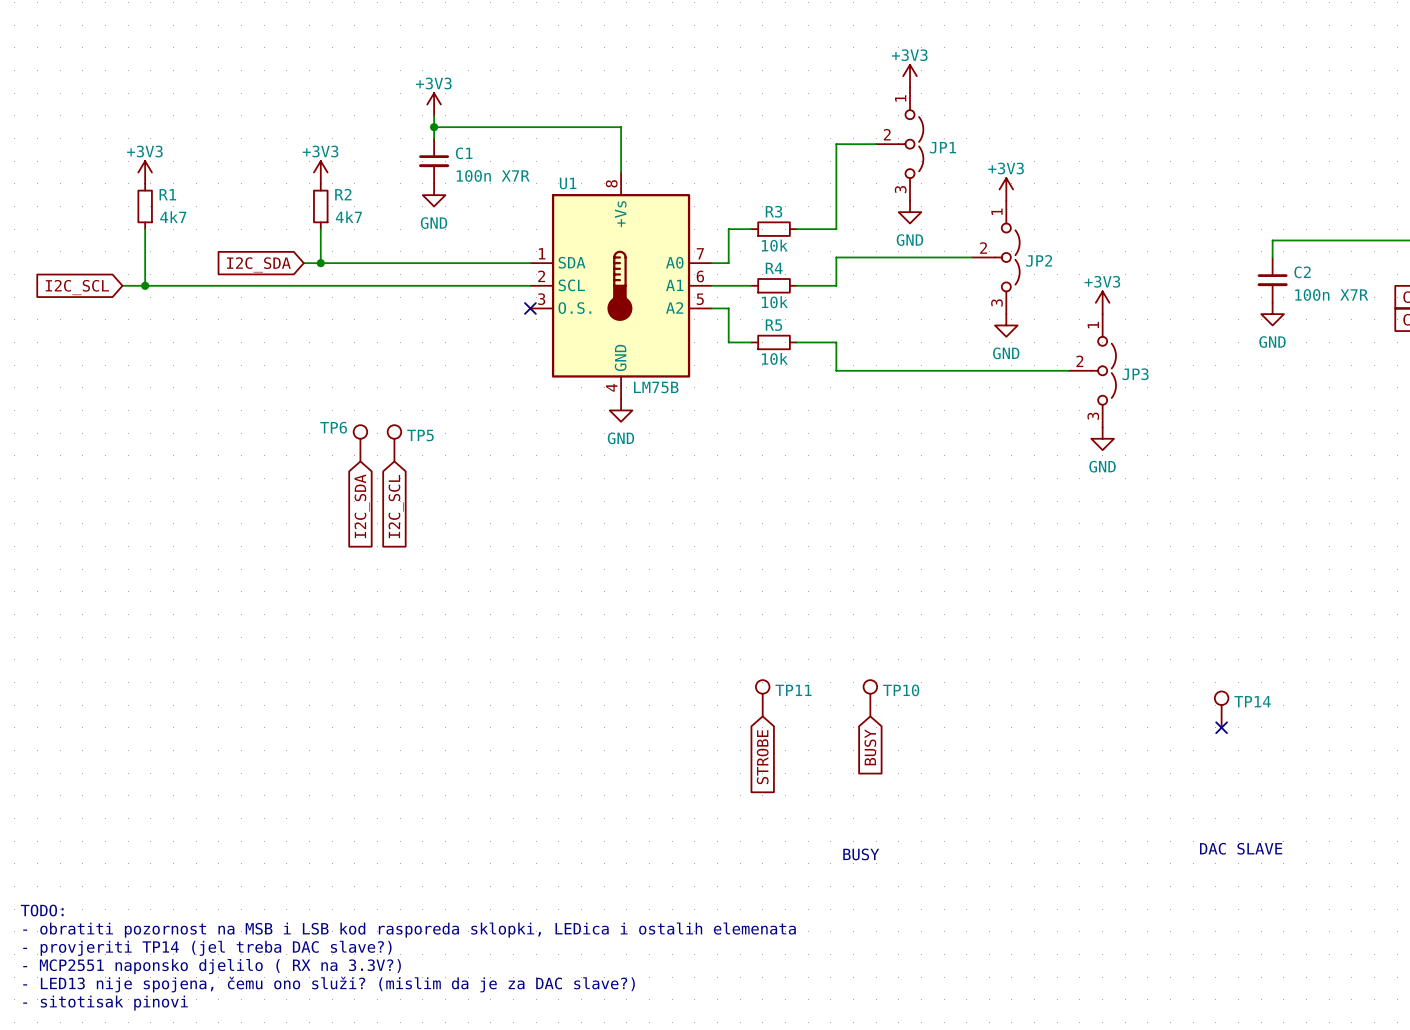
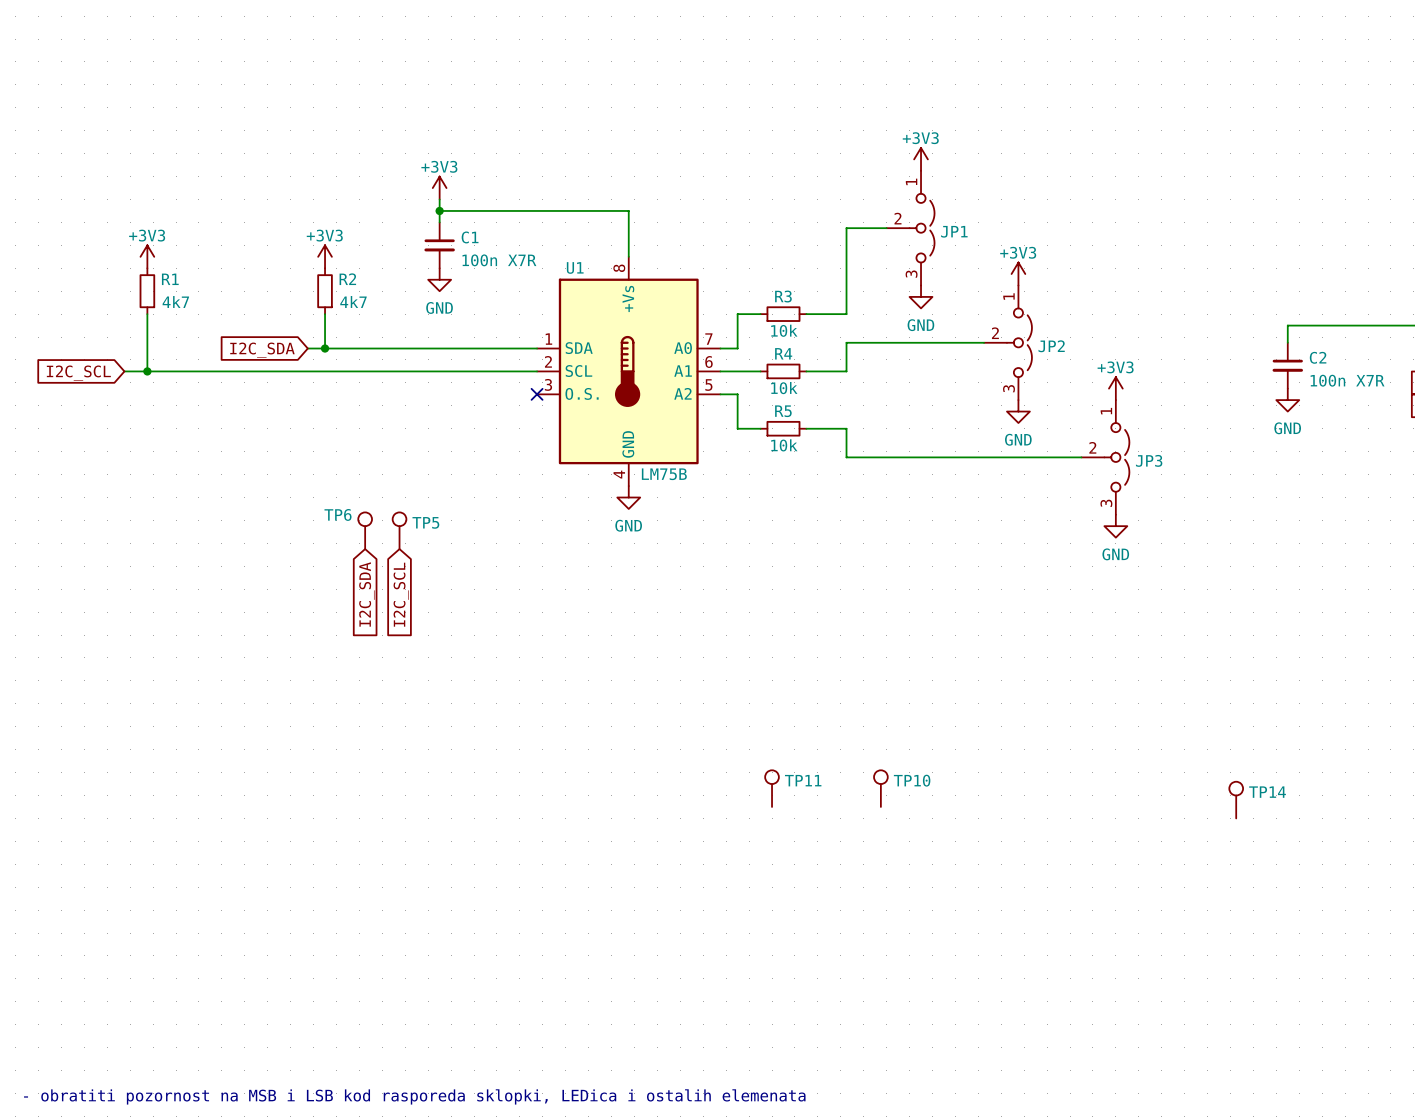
no-connect mark: (1221, 727) -> none
global label: BUSY (870, 747) -> none
global label: STROBE (762, 757) -> none
text: DAC SLAVE (1241, 848) -> none
text: BUSY (861, 854) -> none
text: TODO: (42, 910) -> none
text: - obratiti pozornost na MSB i LSB kod rasporeda sklopki, LEDica i ostalih elemenata (409, 930) -> none
text: - provjeriti TP14 (jel treba DAC slave?) (207, 948) -> none
text: - MCP2551 naponsko djelilo ( RX na 3.3V?) (212, 966) -> none
text: - LED13 nije spojena, čemu ono služi? (mislim da je za DAC slave?) (329, 984) -> none
text: - sitotisak pinovi (105, 1003) -> - obratiti pozornost na MSB i LSB kod rasporeda sklopki, LEDica i ostalih elemenata (414, 1096)

